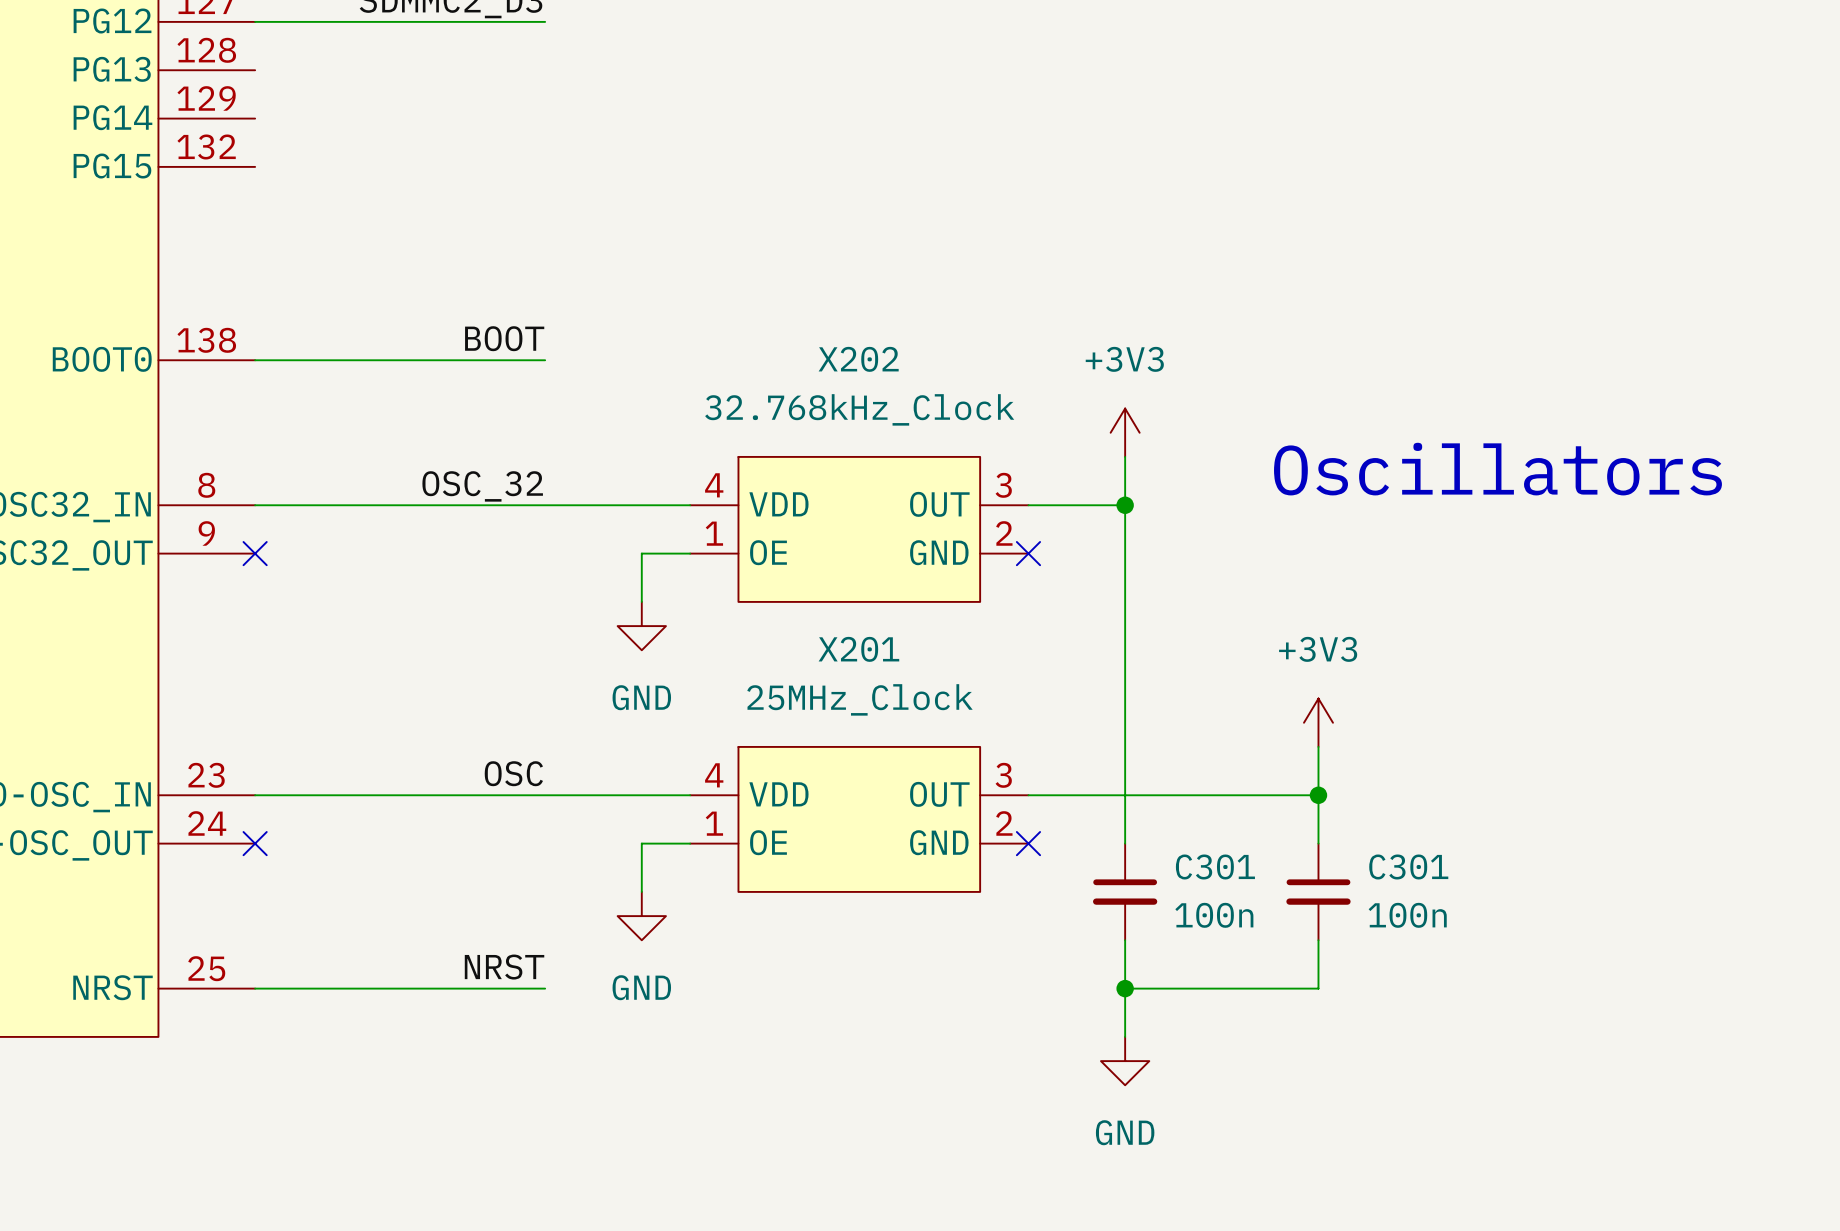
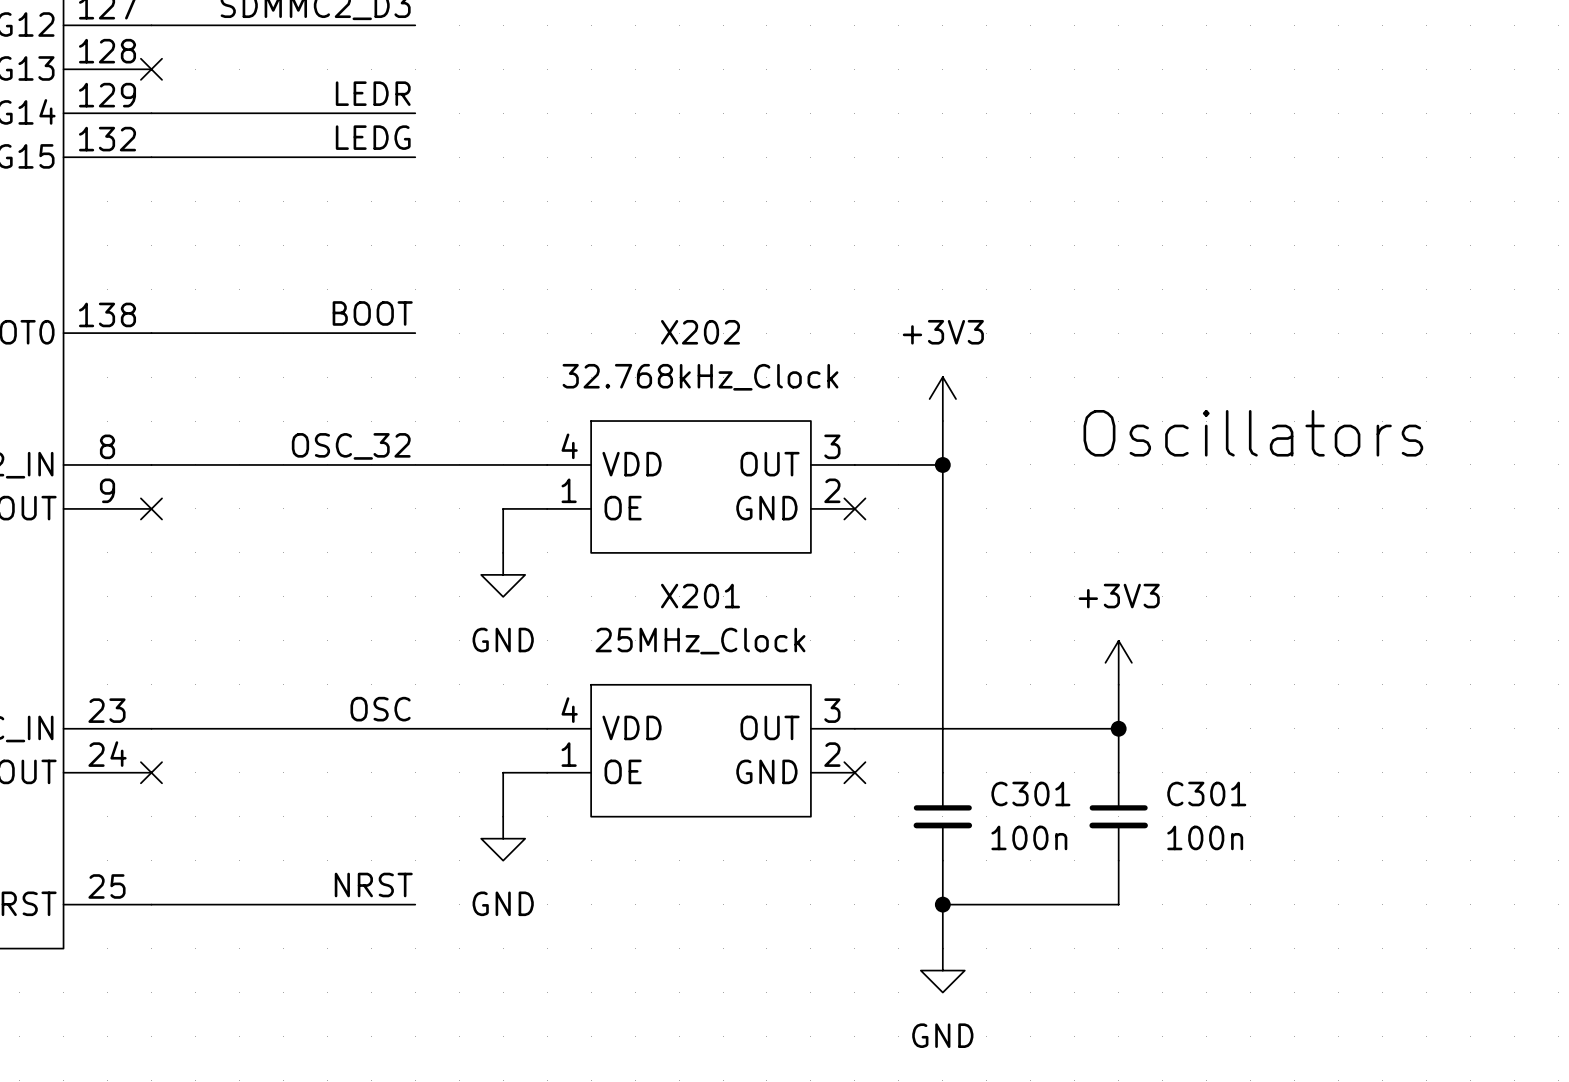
no-connect mark: none -> (151, 69)
label: none -> LEDR (373, 93)
wire: none -> (151, 113) (415, 113)
label: none -> LEDG (373, 137)
wire: none -> (151, 157) (415, 157)

